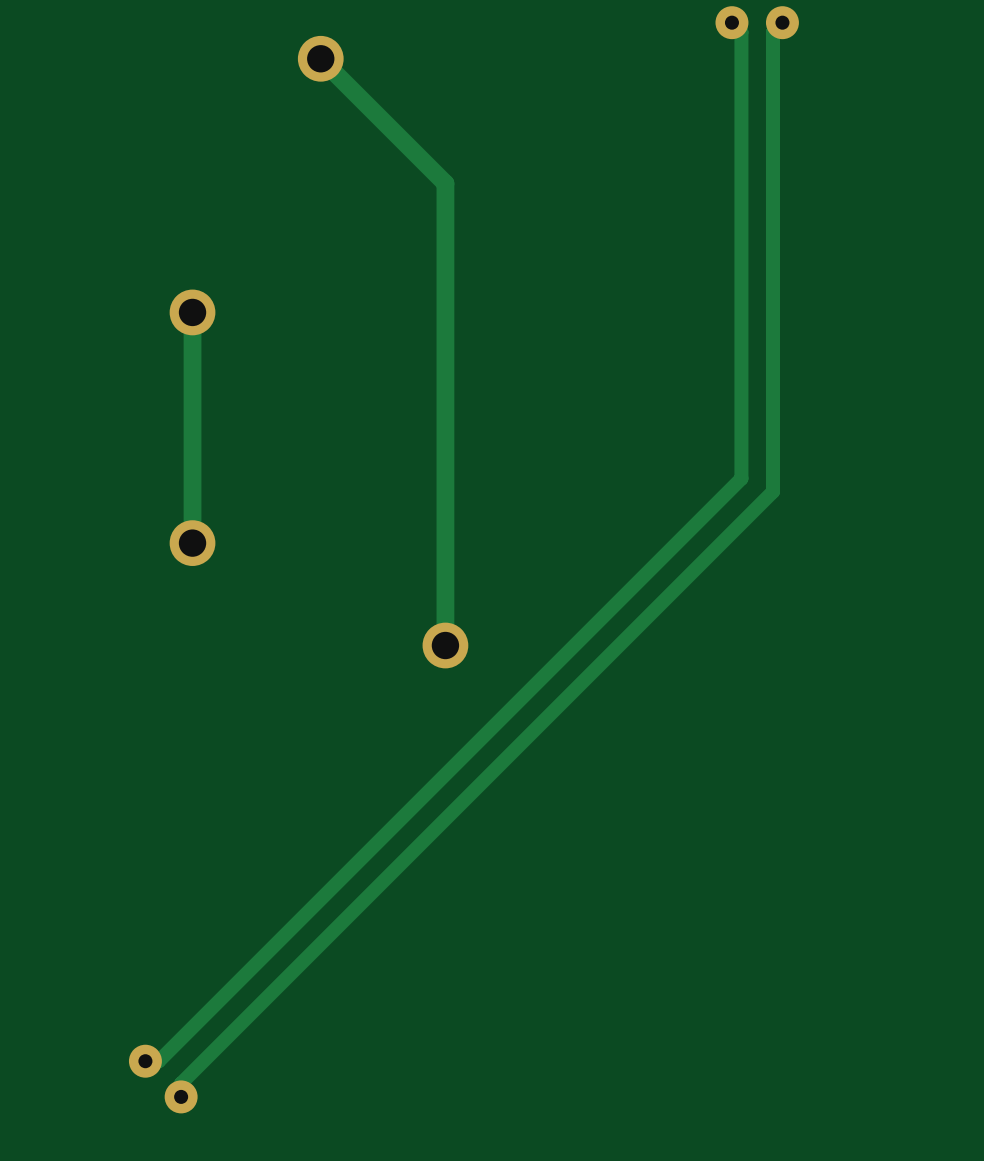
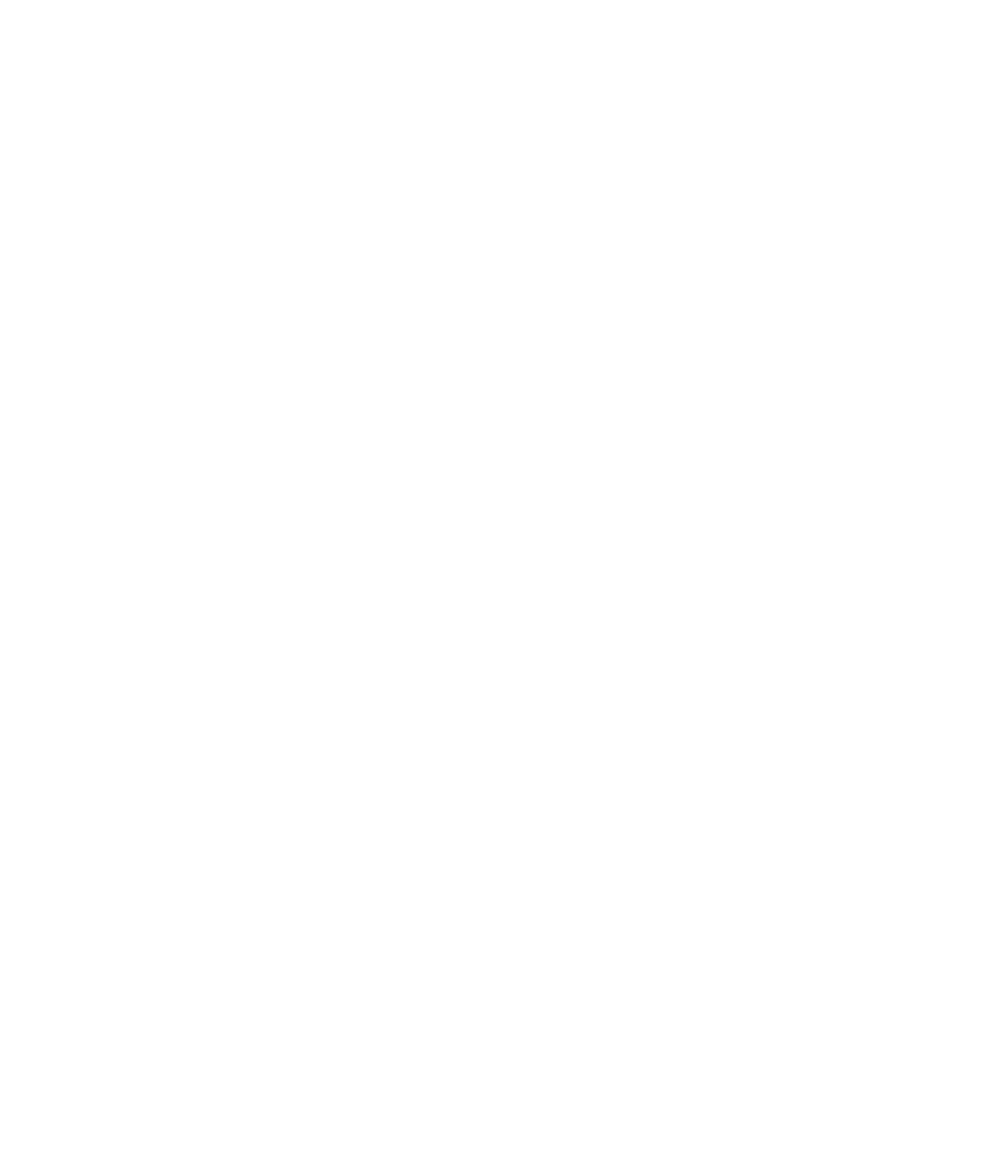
track: (731, 22) (741, 32) (741, 478) (158, 1061) (145, 1061) -> none
via: (731, 22) -> none
track: (782, 22) (772, 32) (772, 491) (181, 1083) (181, 1096) -> none
via: (782, 22) -> none
track: (320, 58) (445, 183) (445, 645) -> none
via: (320, 58) -> none
track: (192, 312) (192, 543) -> none
via: (192, 312) -> none
via: (192, 543) -> none
via: (445, 645) -> none
via: (145, 1061) -> none
via: (181, 1096) -> none

